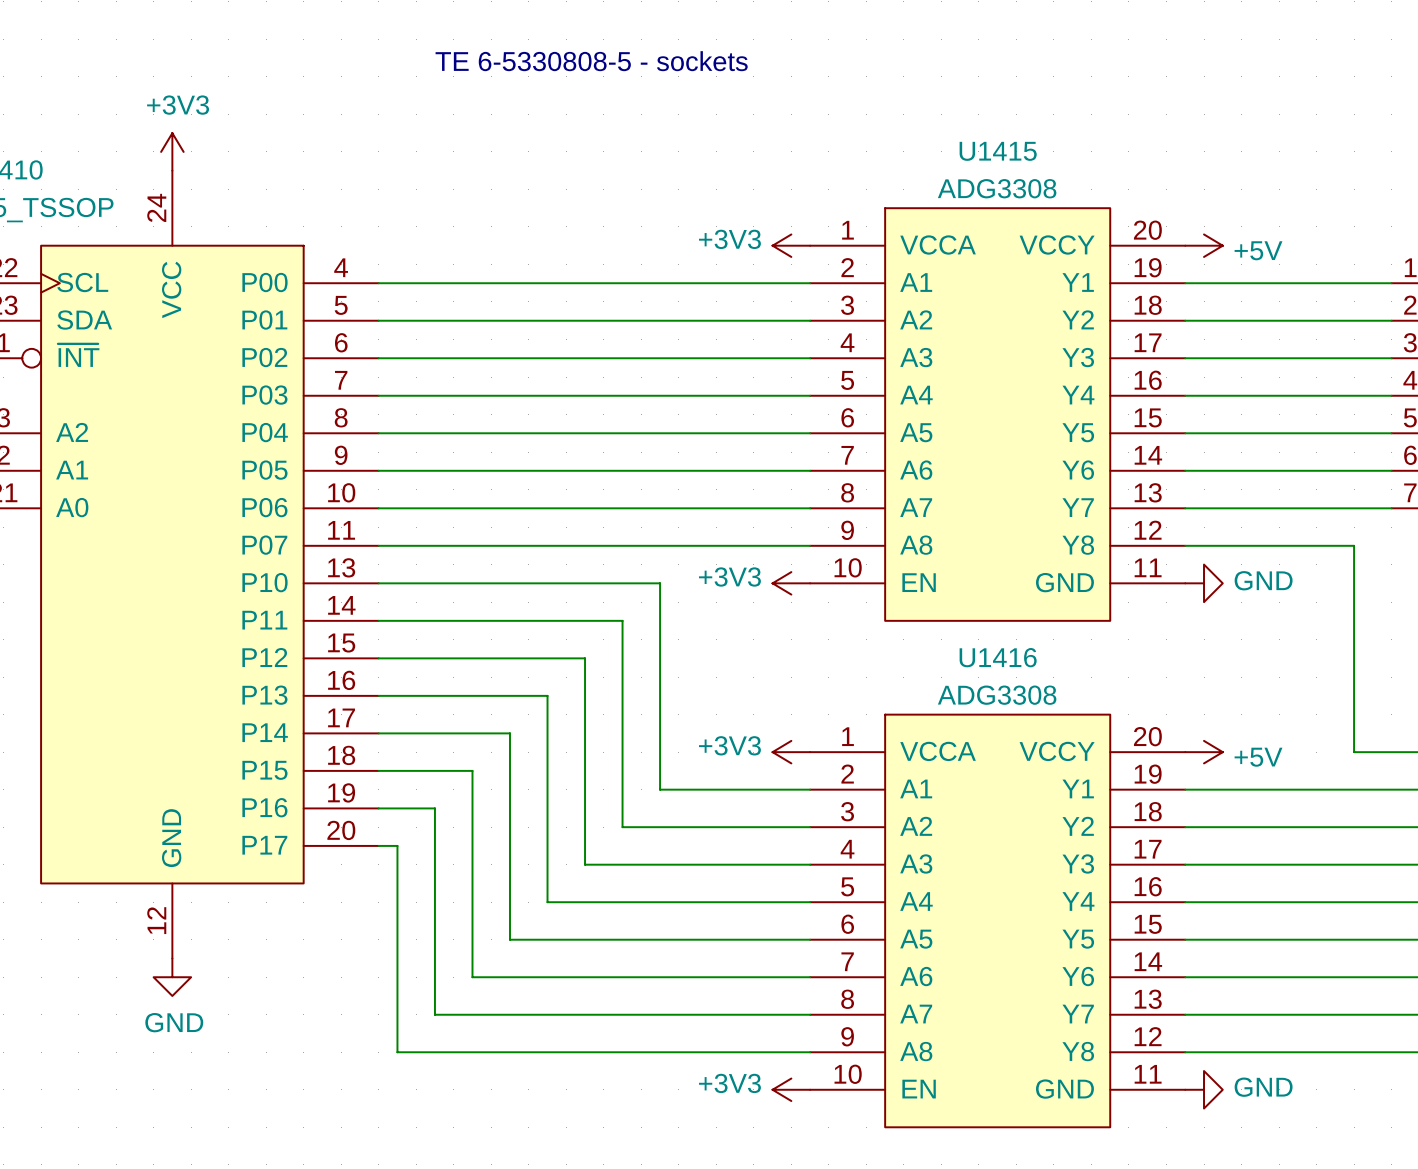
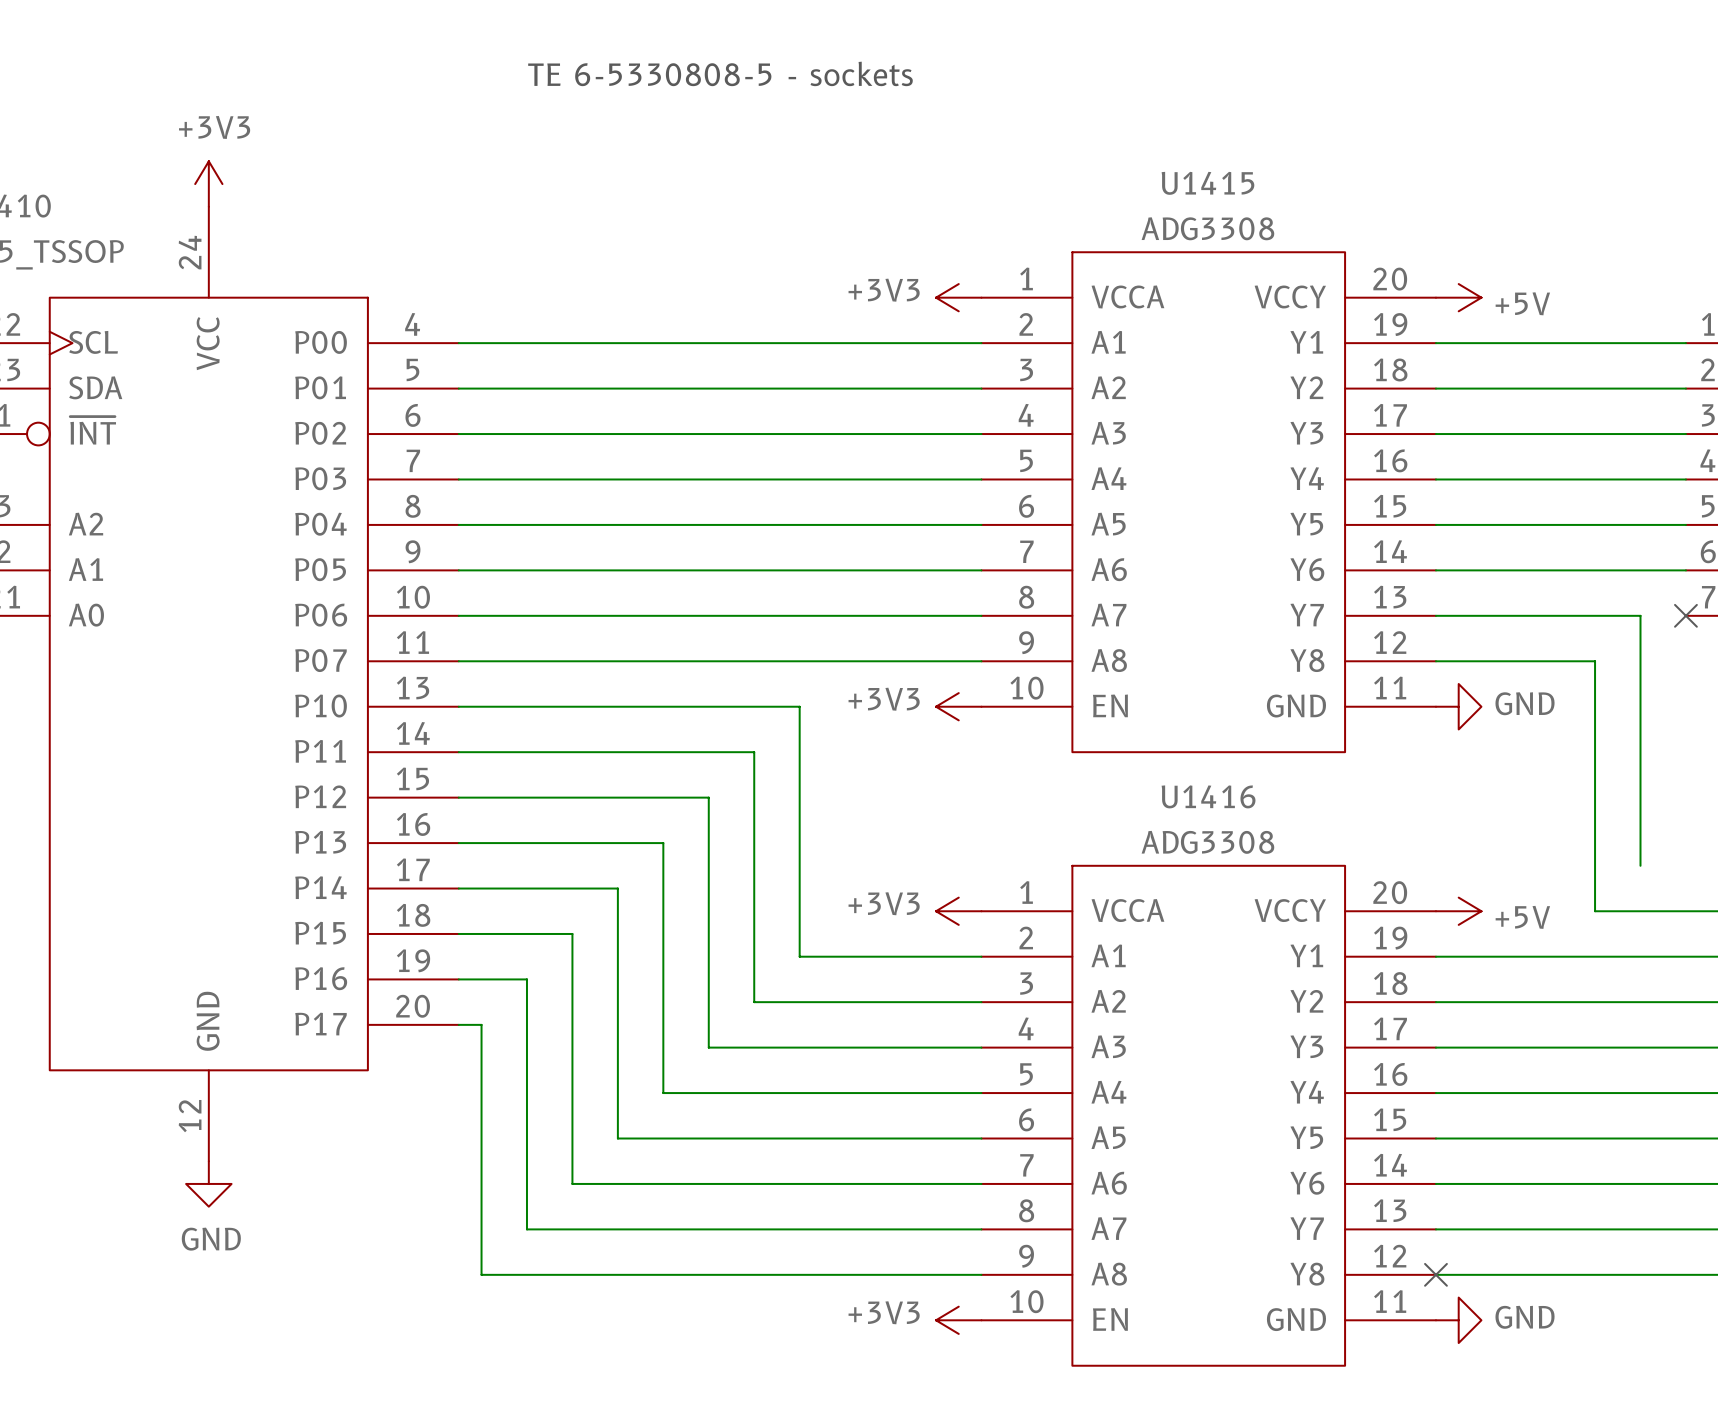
wire: (1354, 508) (1391, 508) -> (1640, 615) (1640, 661)
no-connect mark: none -> (1685, 615)
wire: (1316, 545) (1354, 545) -> none
wire: (1354, 714) (1354, 752) -> (1595, 661) (1595, 911) (1640, 911)
no-connect mark: none -> (1435, 1274)

